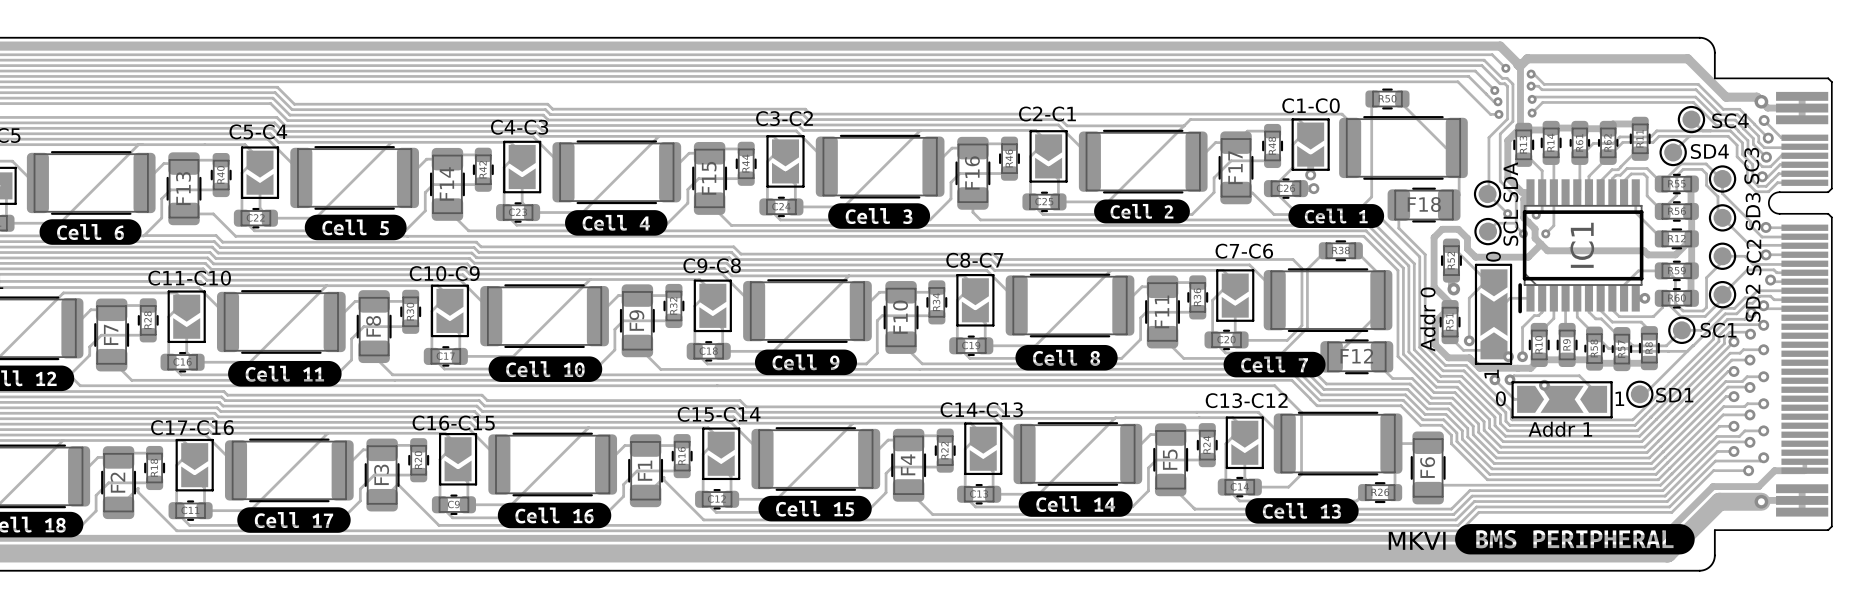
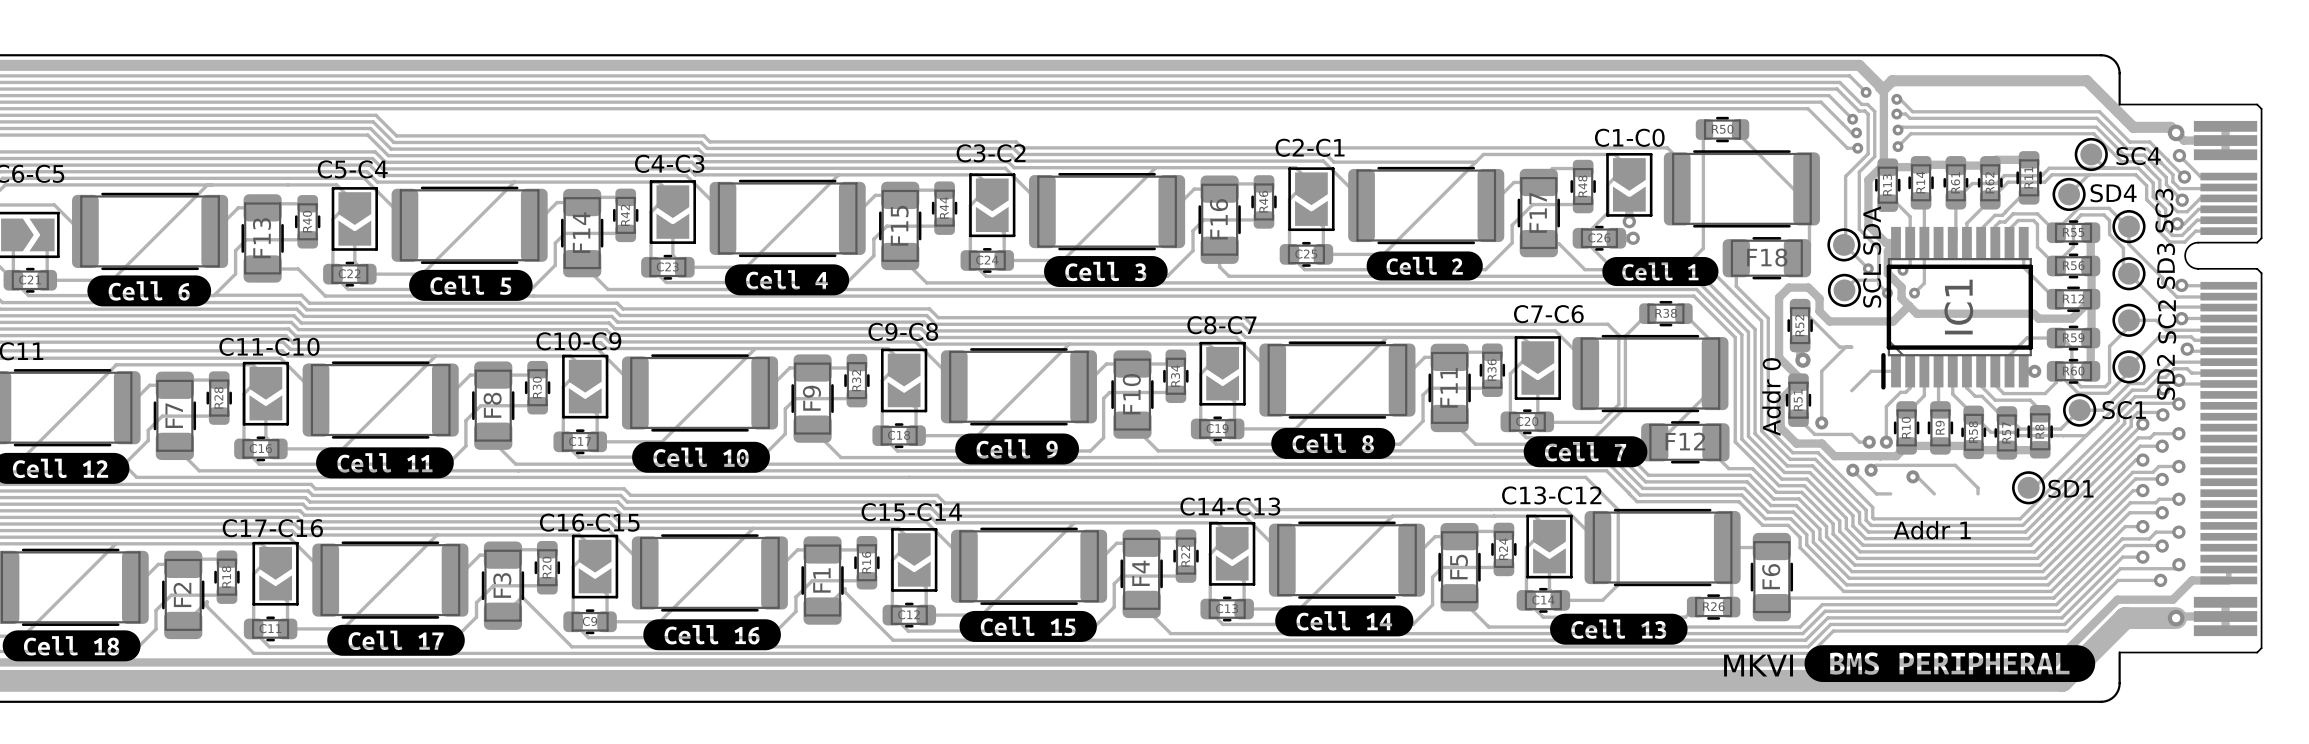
part: (1493, 314) -> none
part: (1562, 399) -> none

